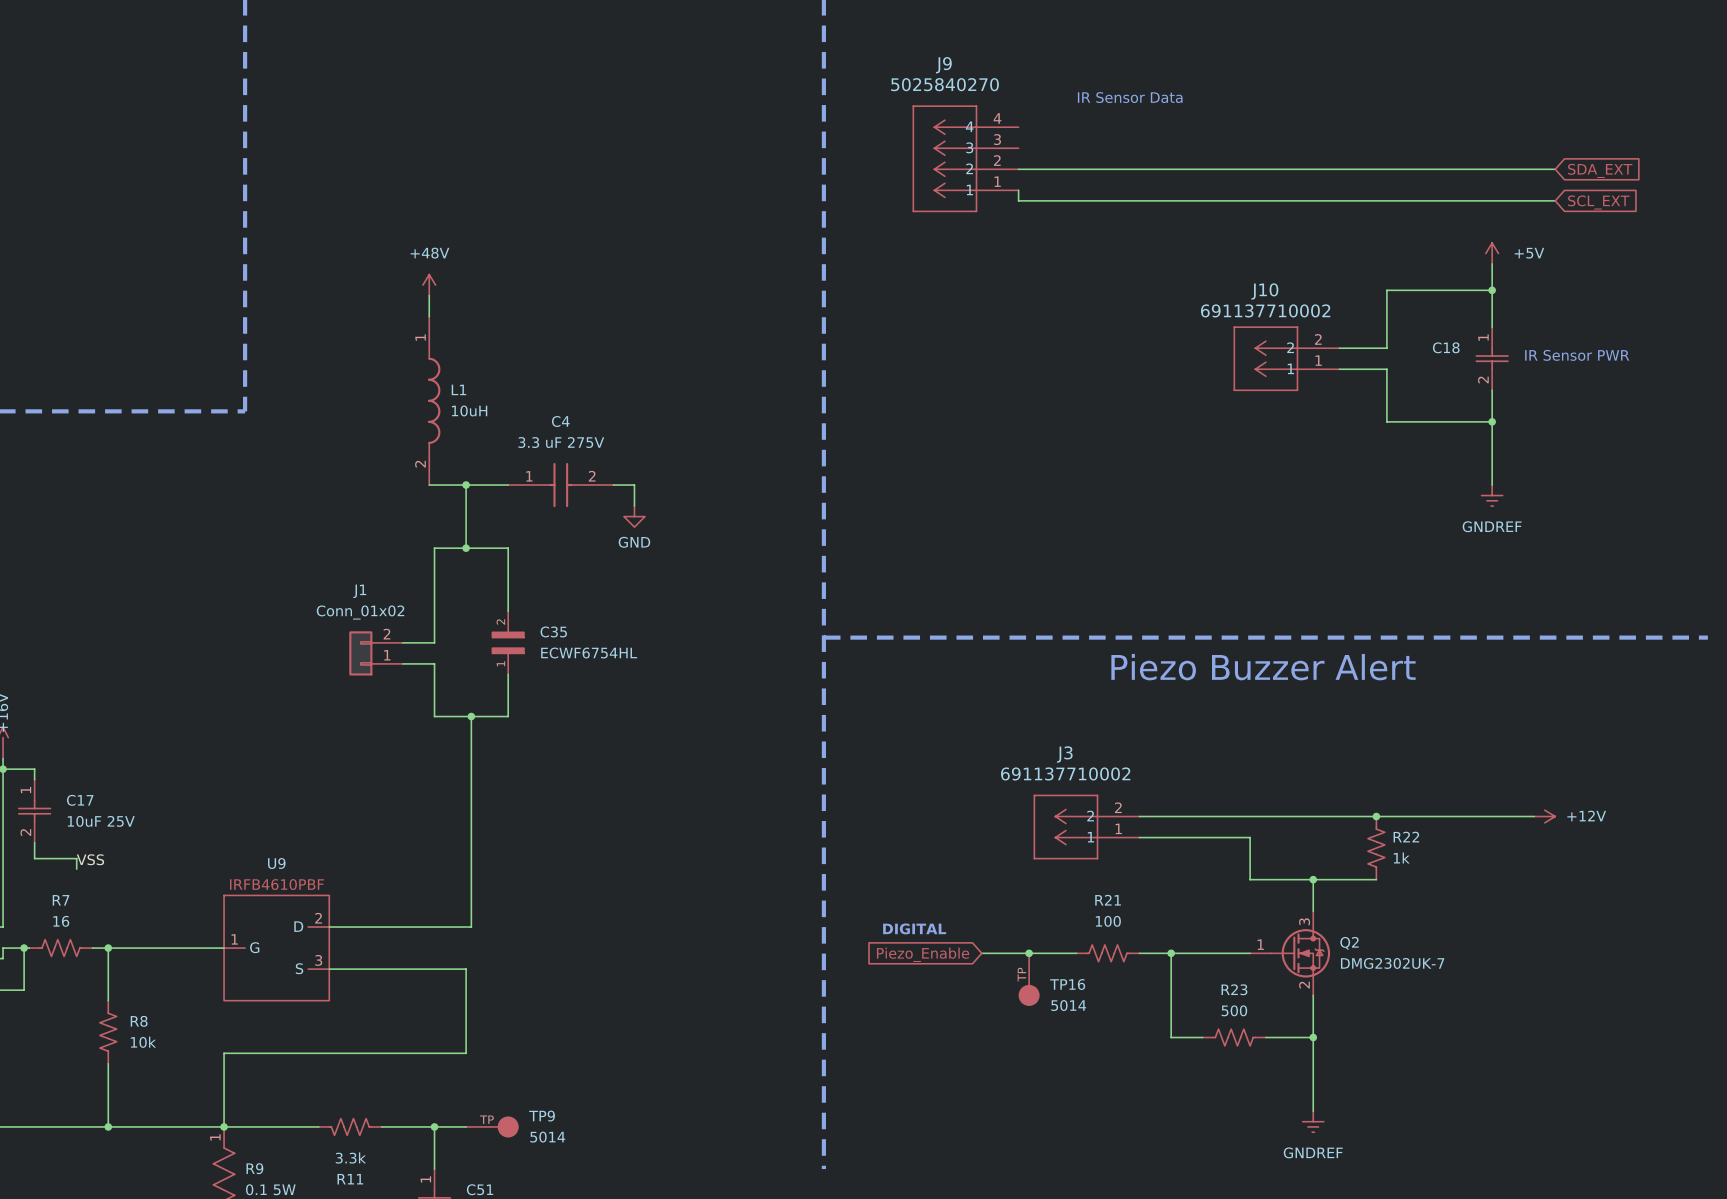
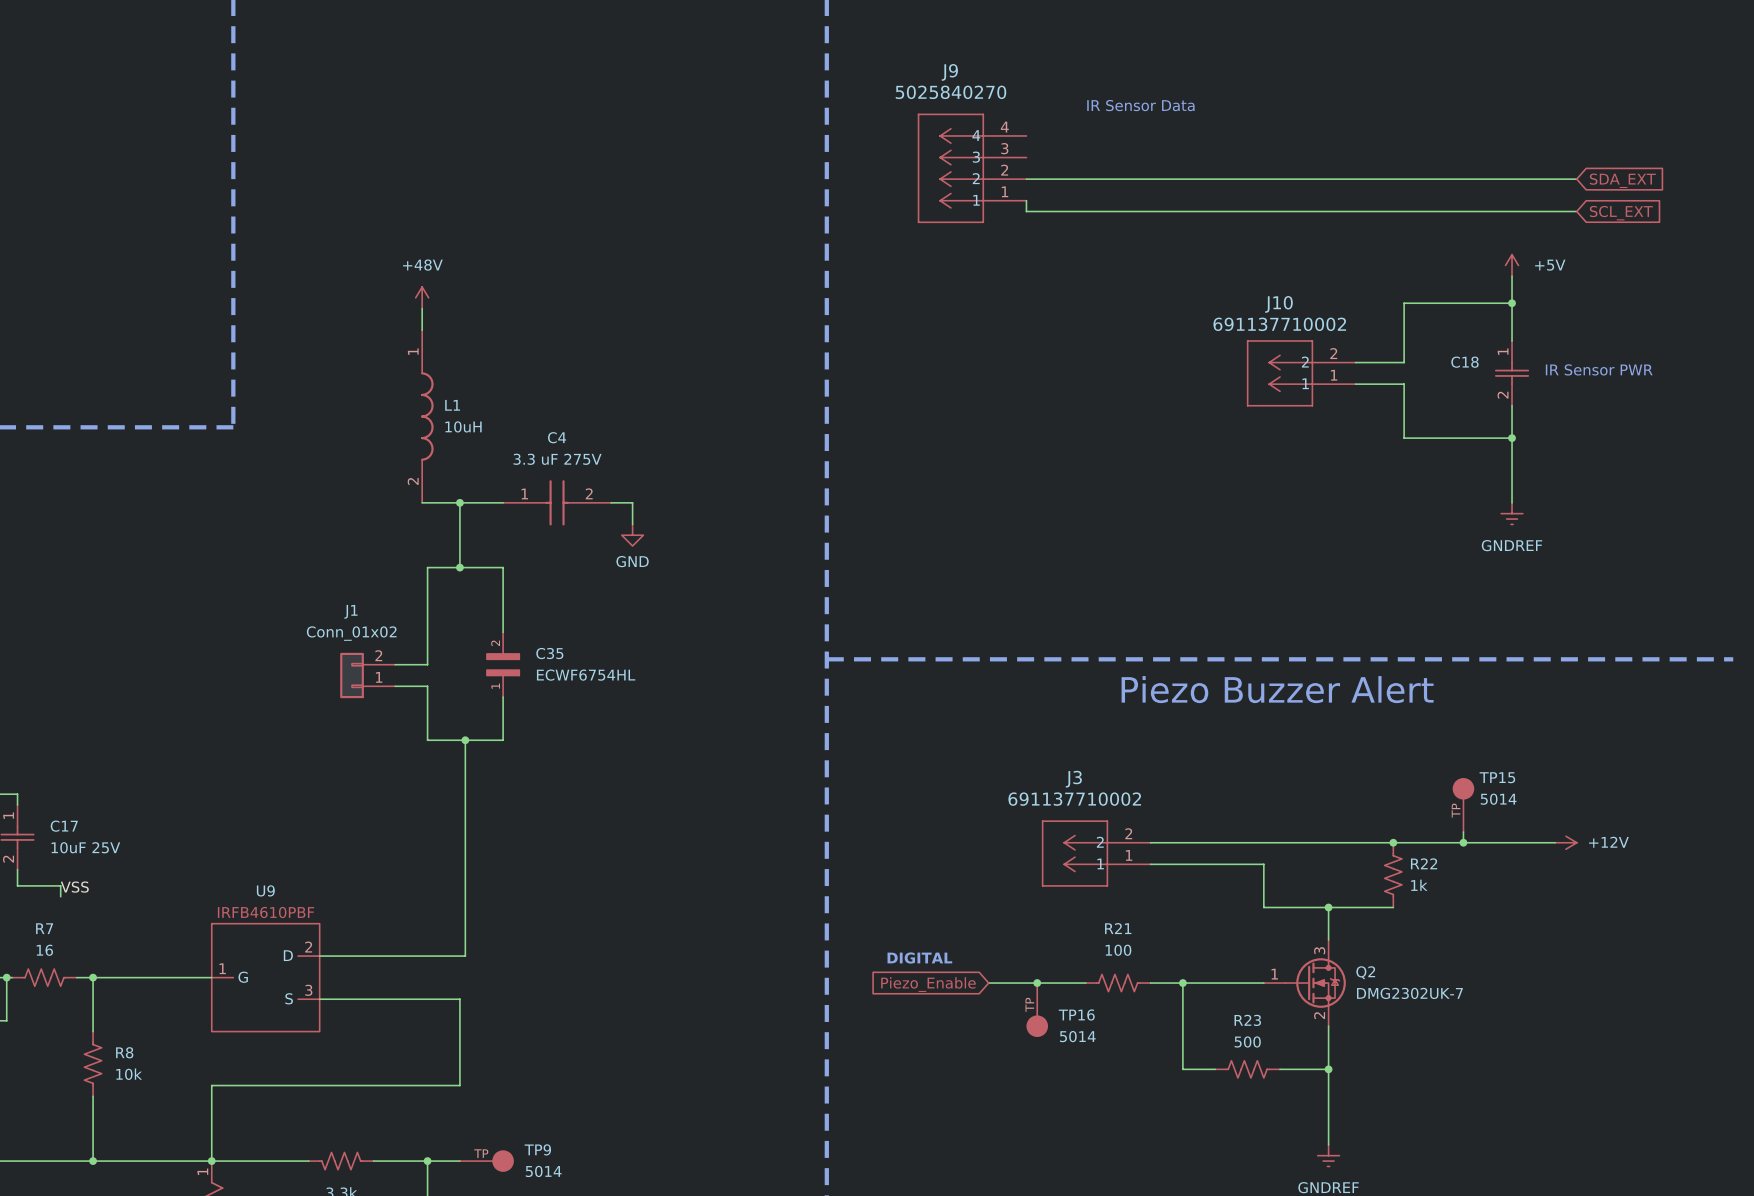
TP15: none -> 5014 (1463, 804)
wire: none -> (1463, 831) (1463, 842)
junction: none -> (1463, 842)

